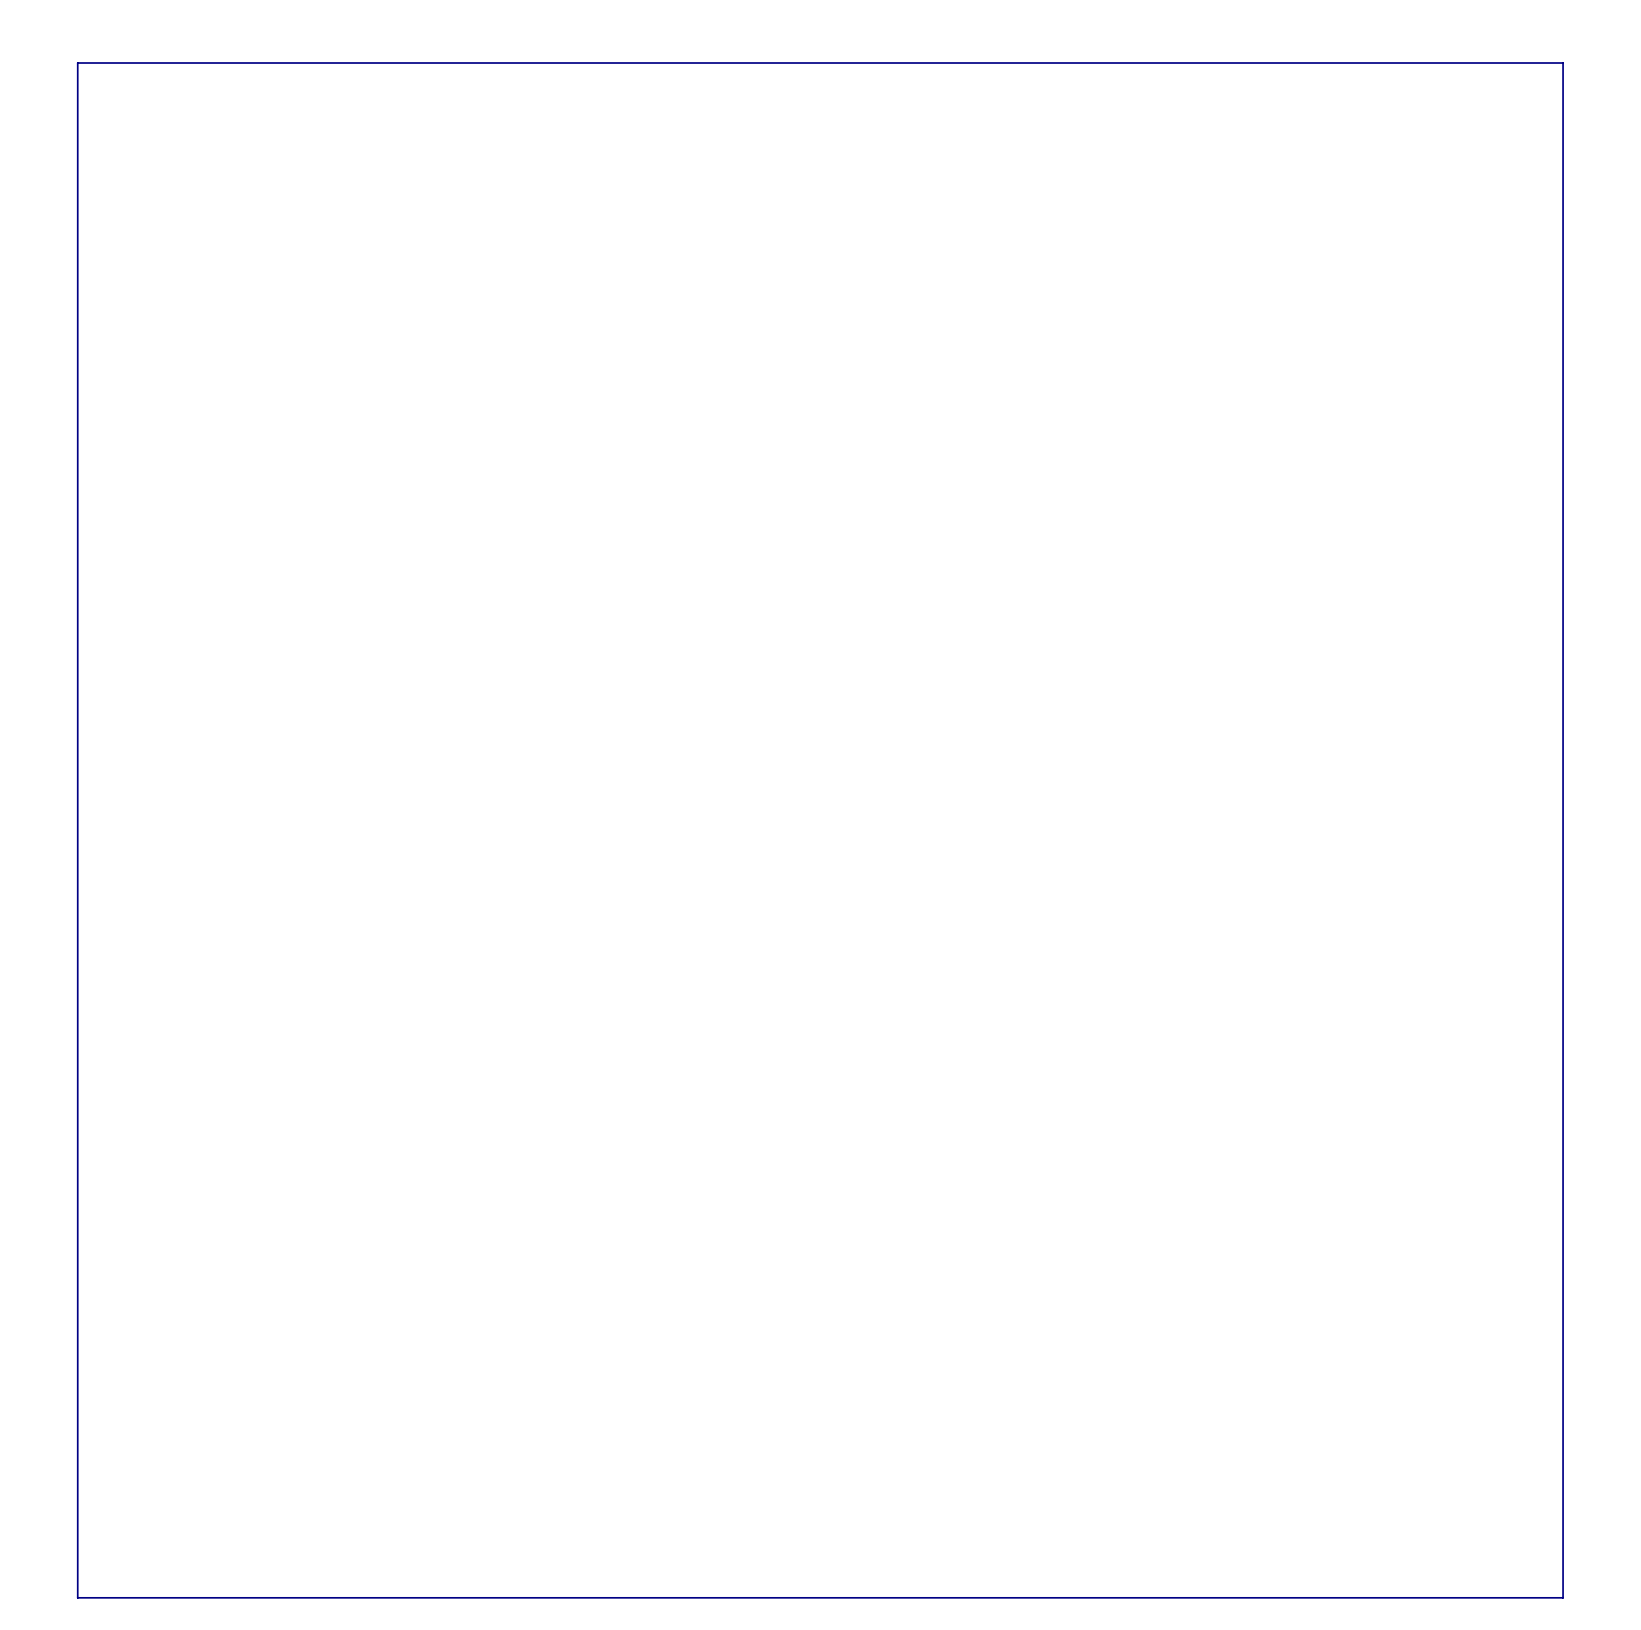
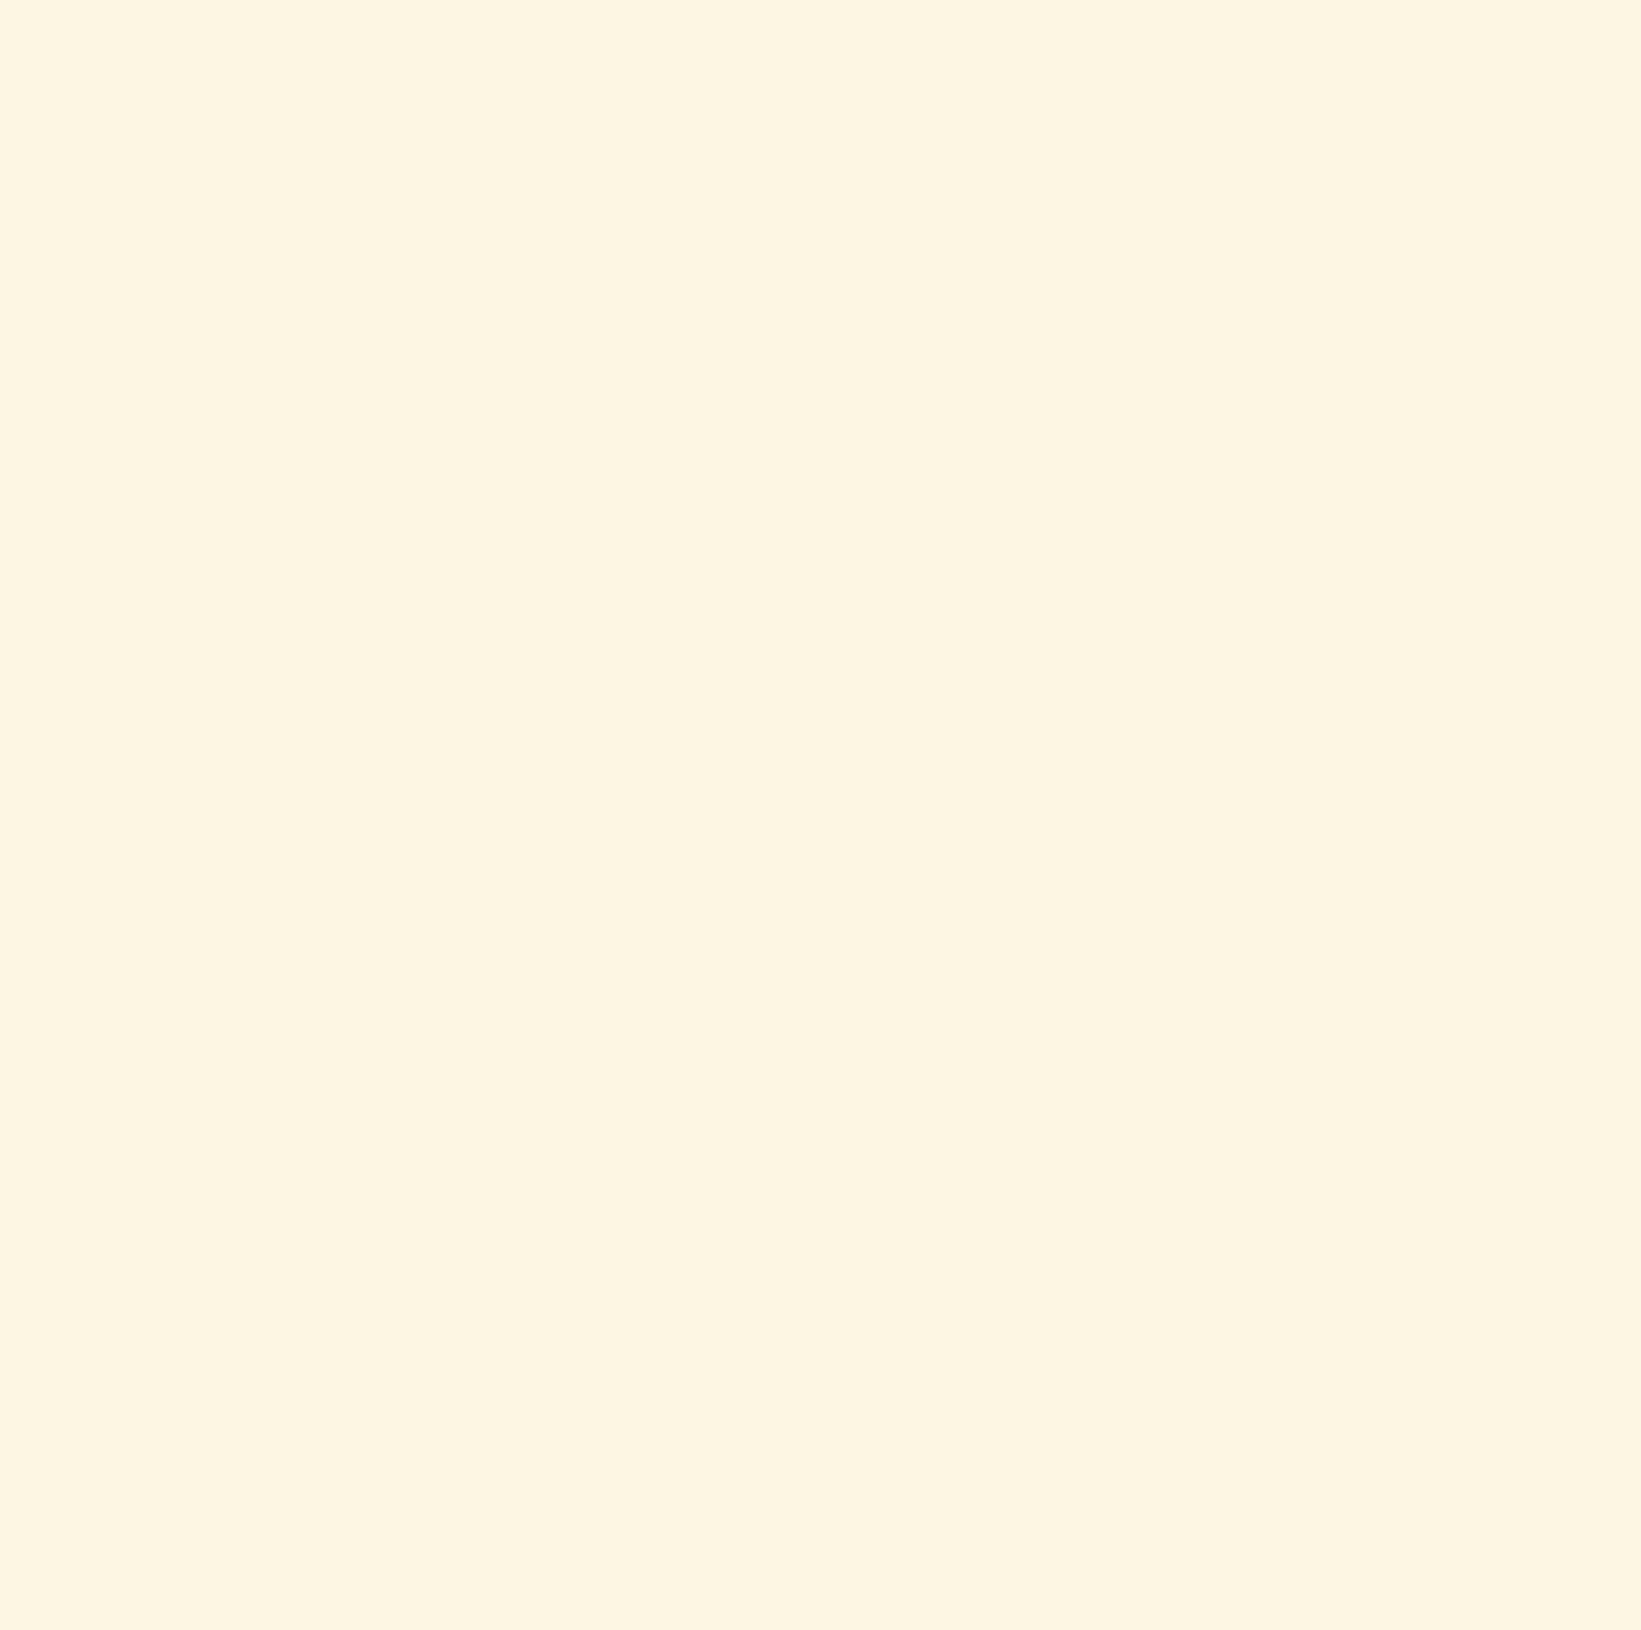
line: (77, 63) (77, 1597) (1563, 1597) (1563, 63) (77, 63) -> none

